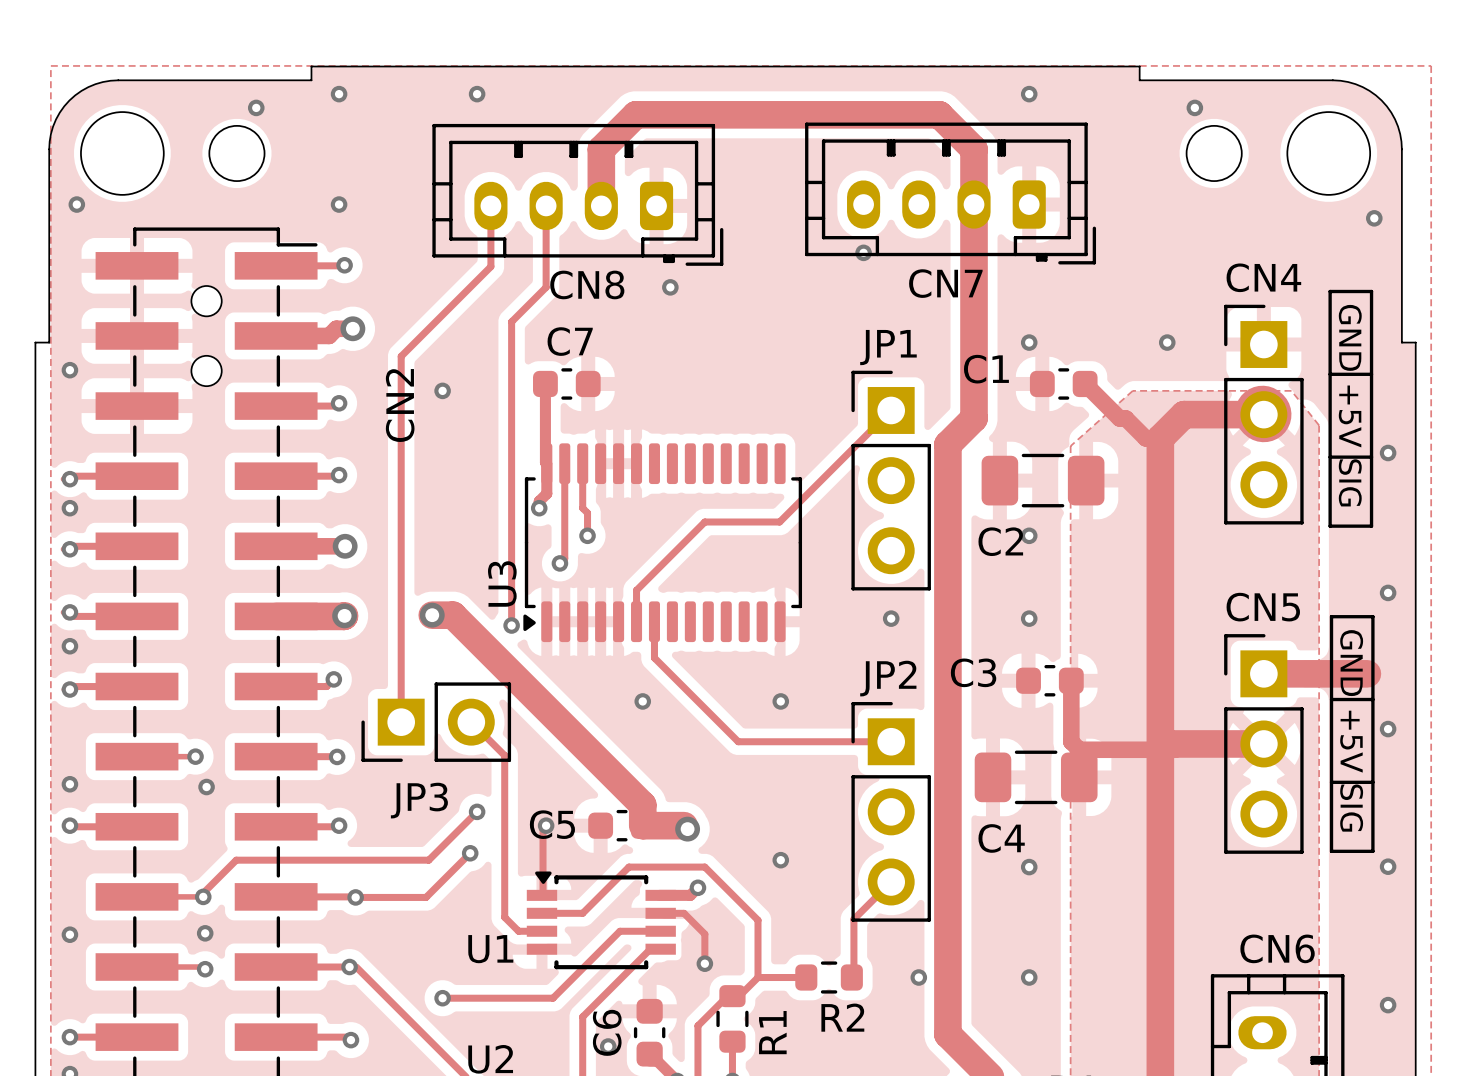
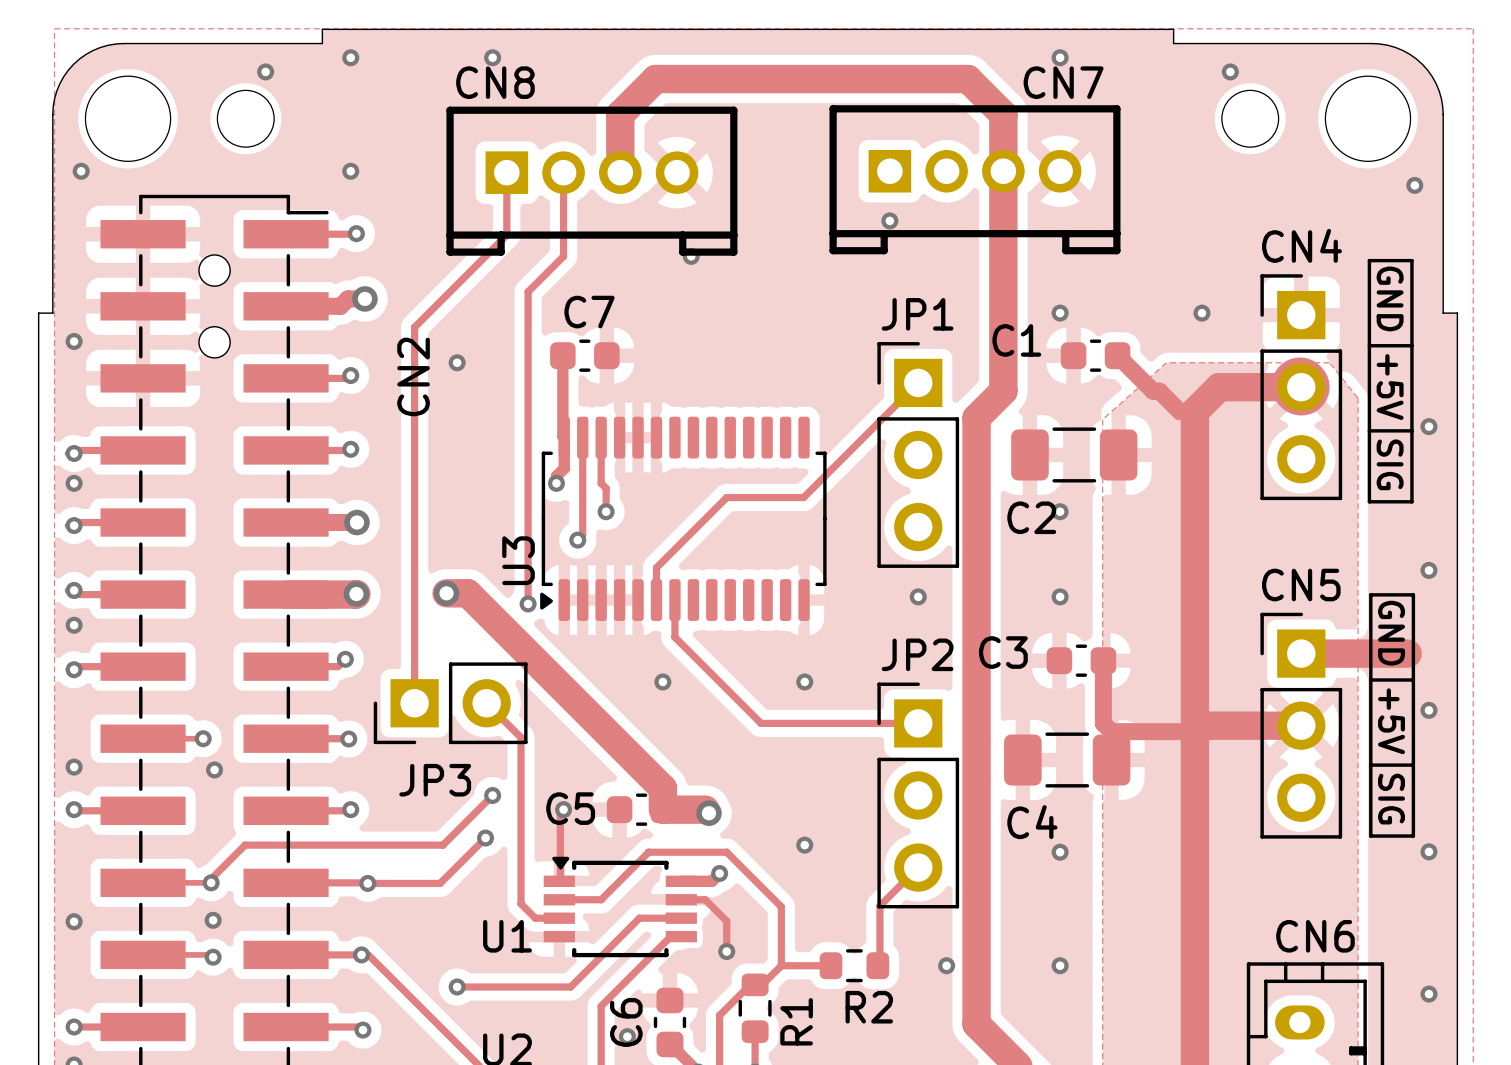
CN7 footprint: [805, 122, 1097, 265] -> [829, 105, 1121, 255]
CN8 footprint: [432, 123, 724, 266] -> [446, 106, 738, 256]
CN7 name position: CN7 (945, 283) -> CN7 (1063, 82)
CN8 name position: CN8 (587, 284) -> CN8 (495, 82)

